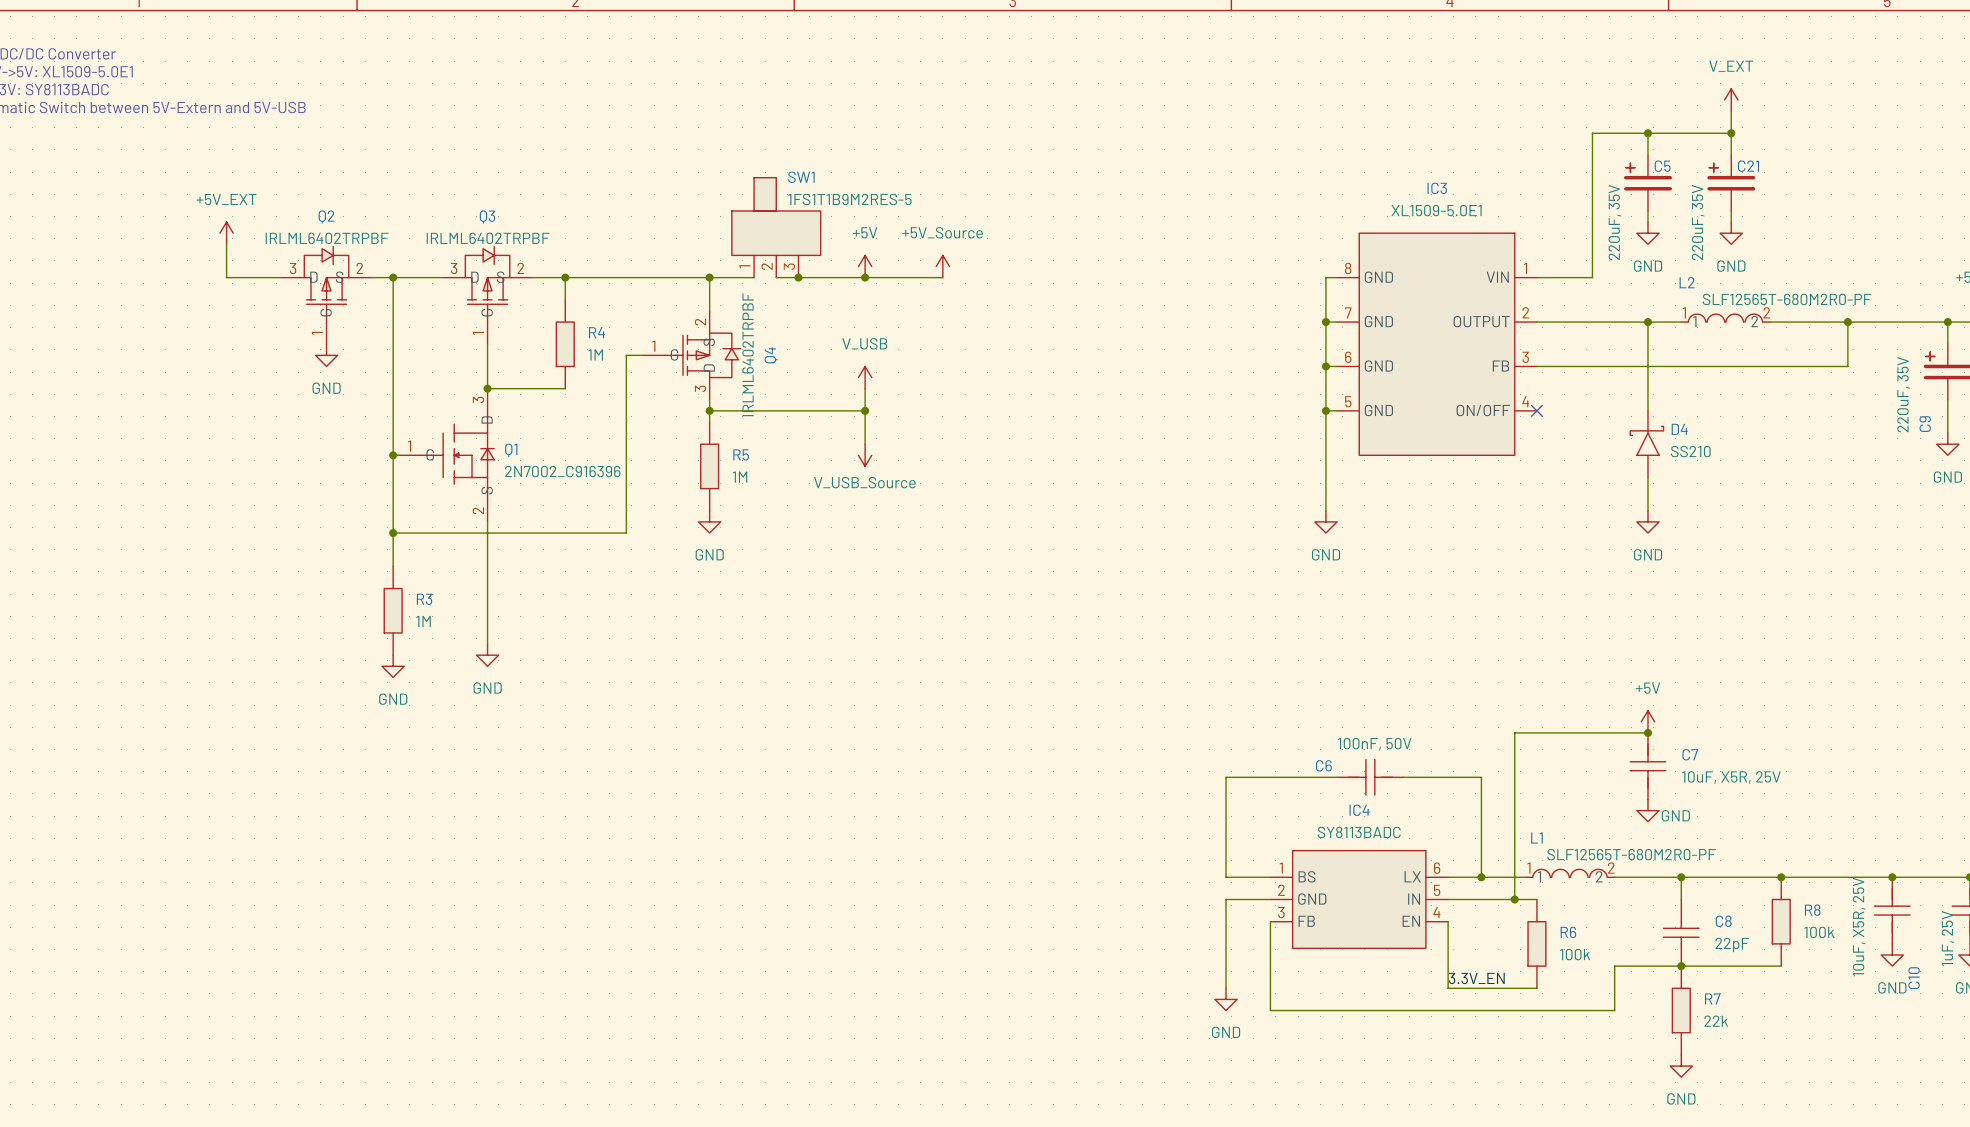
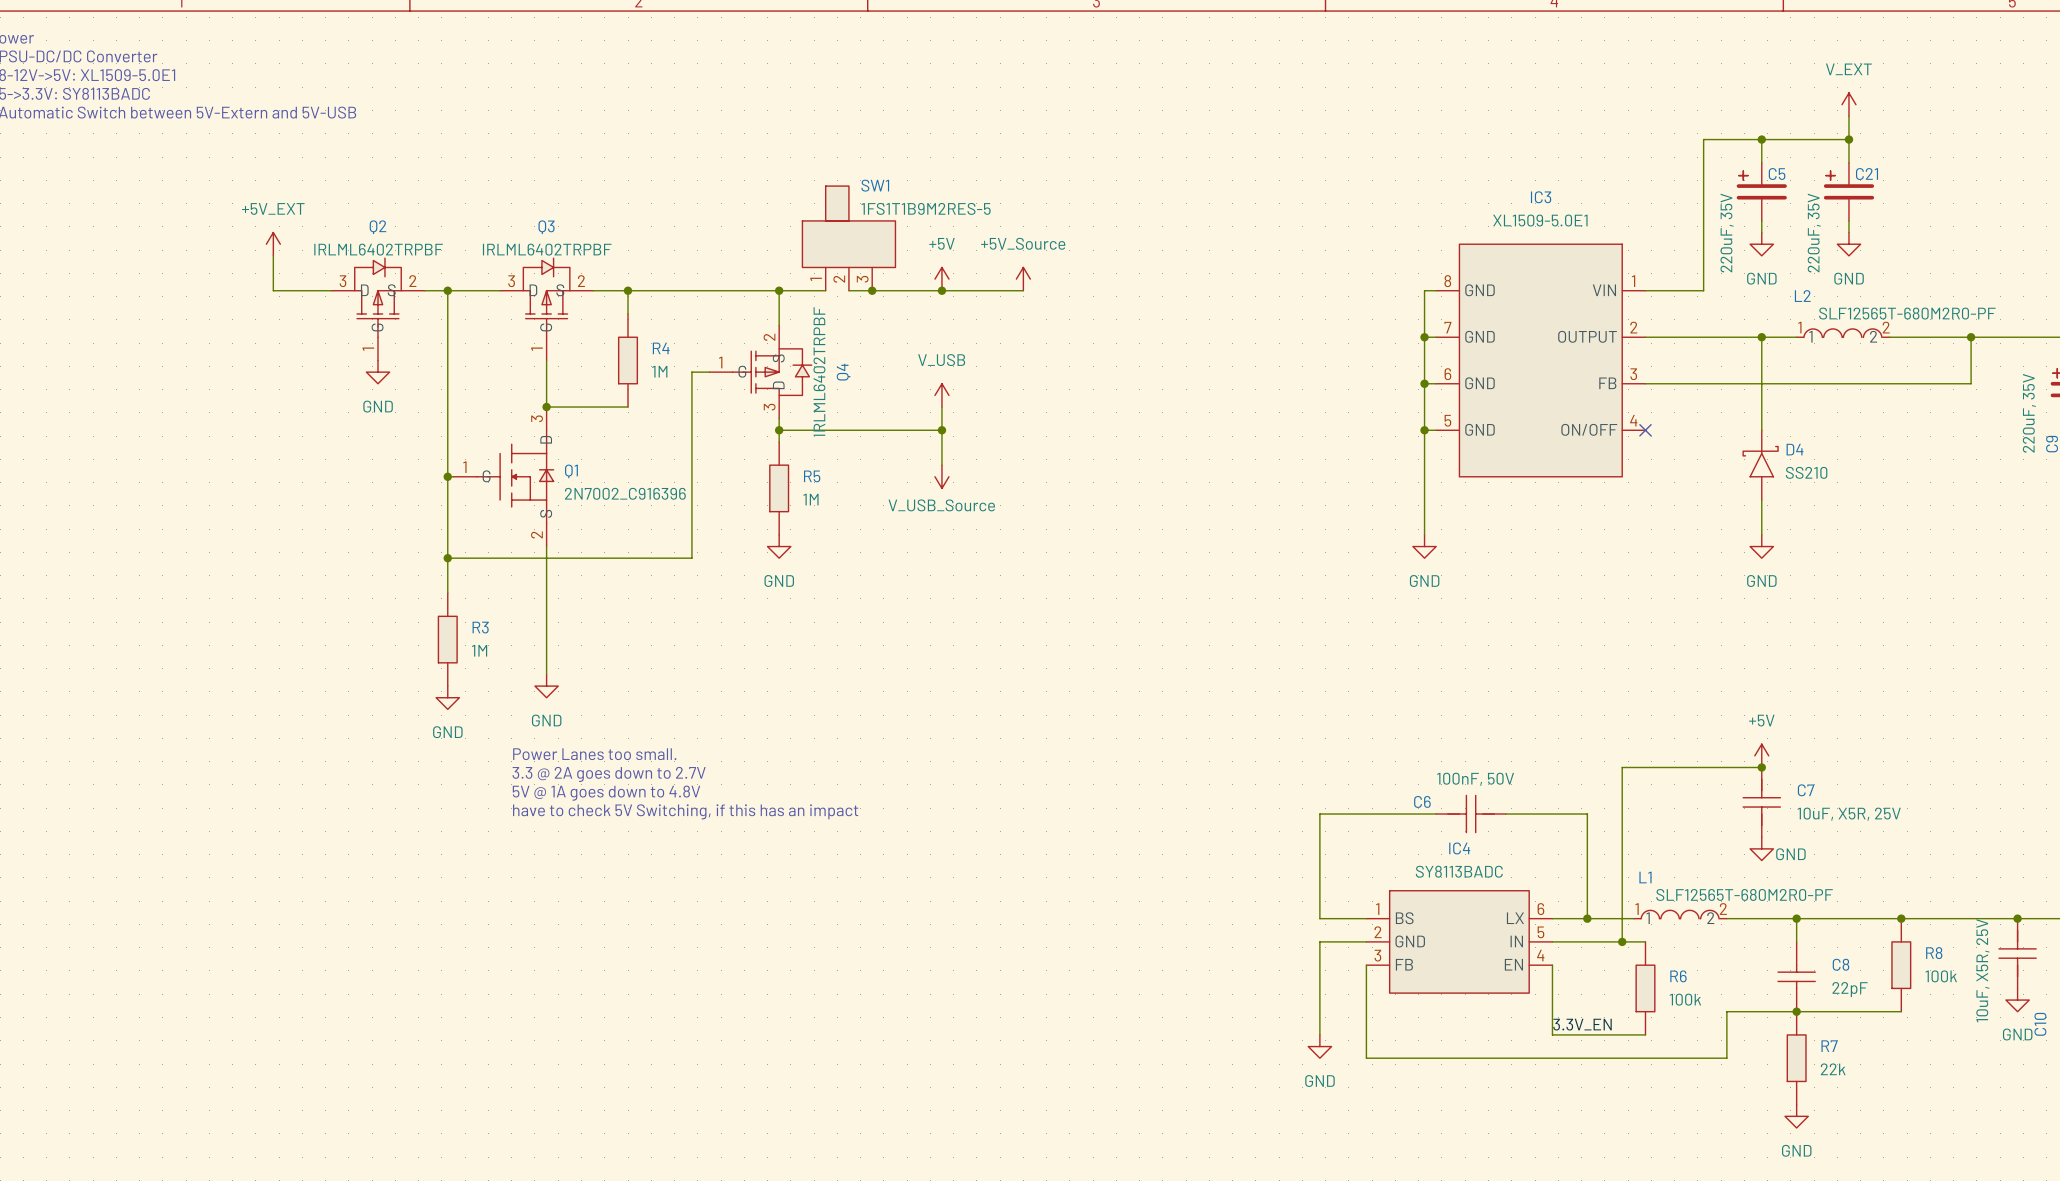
text: none -> Power Lanes too small. (594, 754)
text: none -> 3.3 @ 2A goes down to 2.7V (609, 774)
text: none -> 5V @ 1A goes down to 4.8V (606, 793)
text: none -> have to check 5V Switching, if this has an impact (685, 811)

